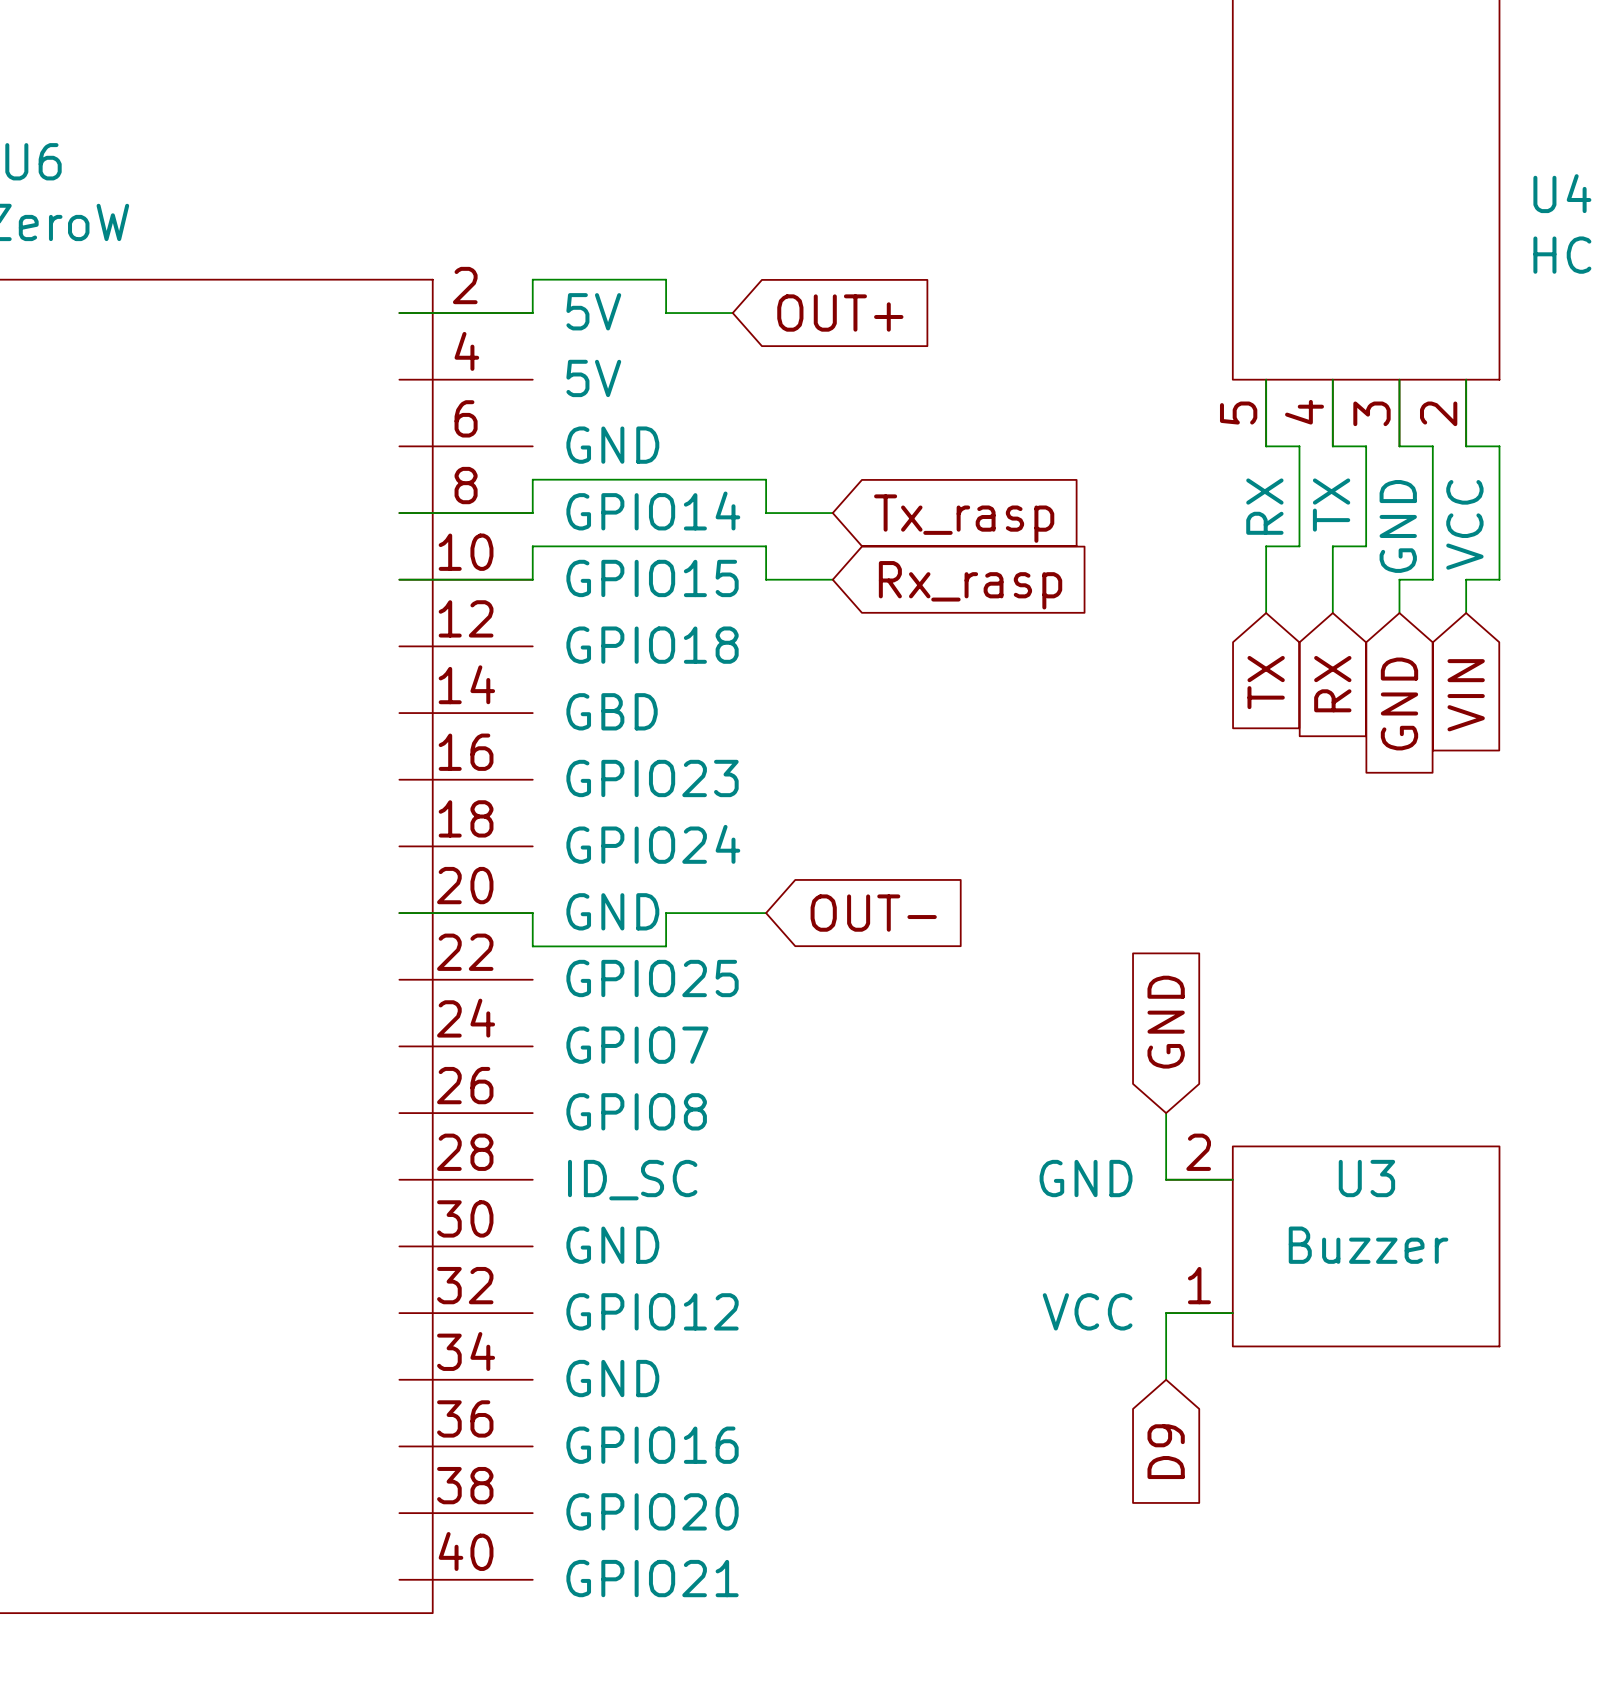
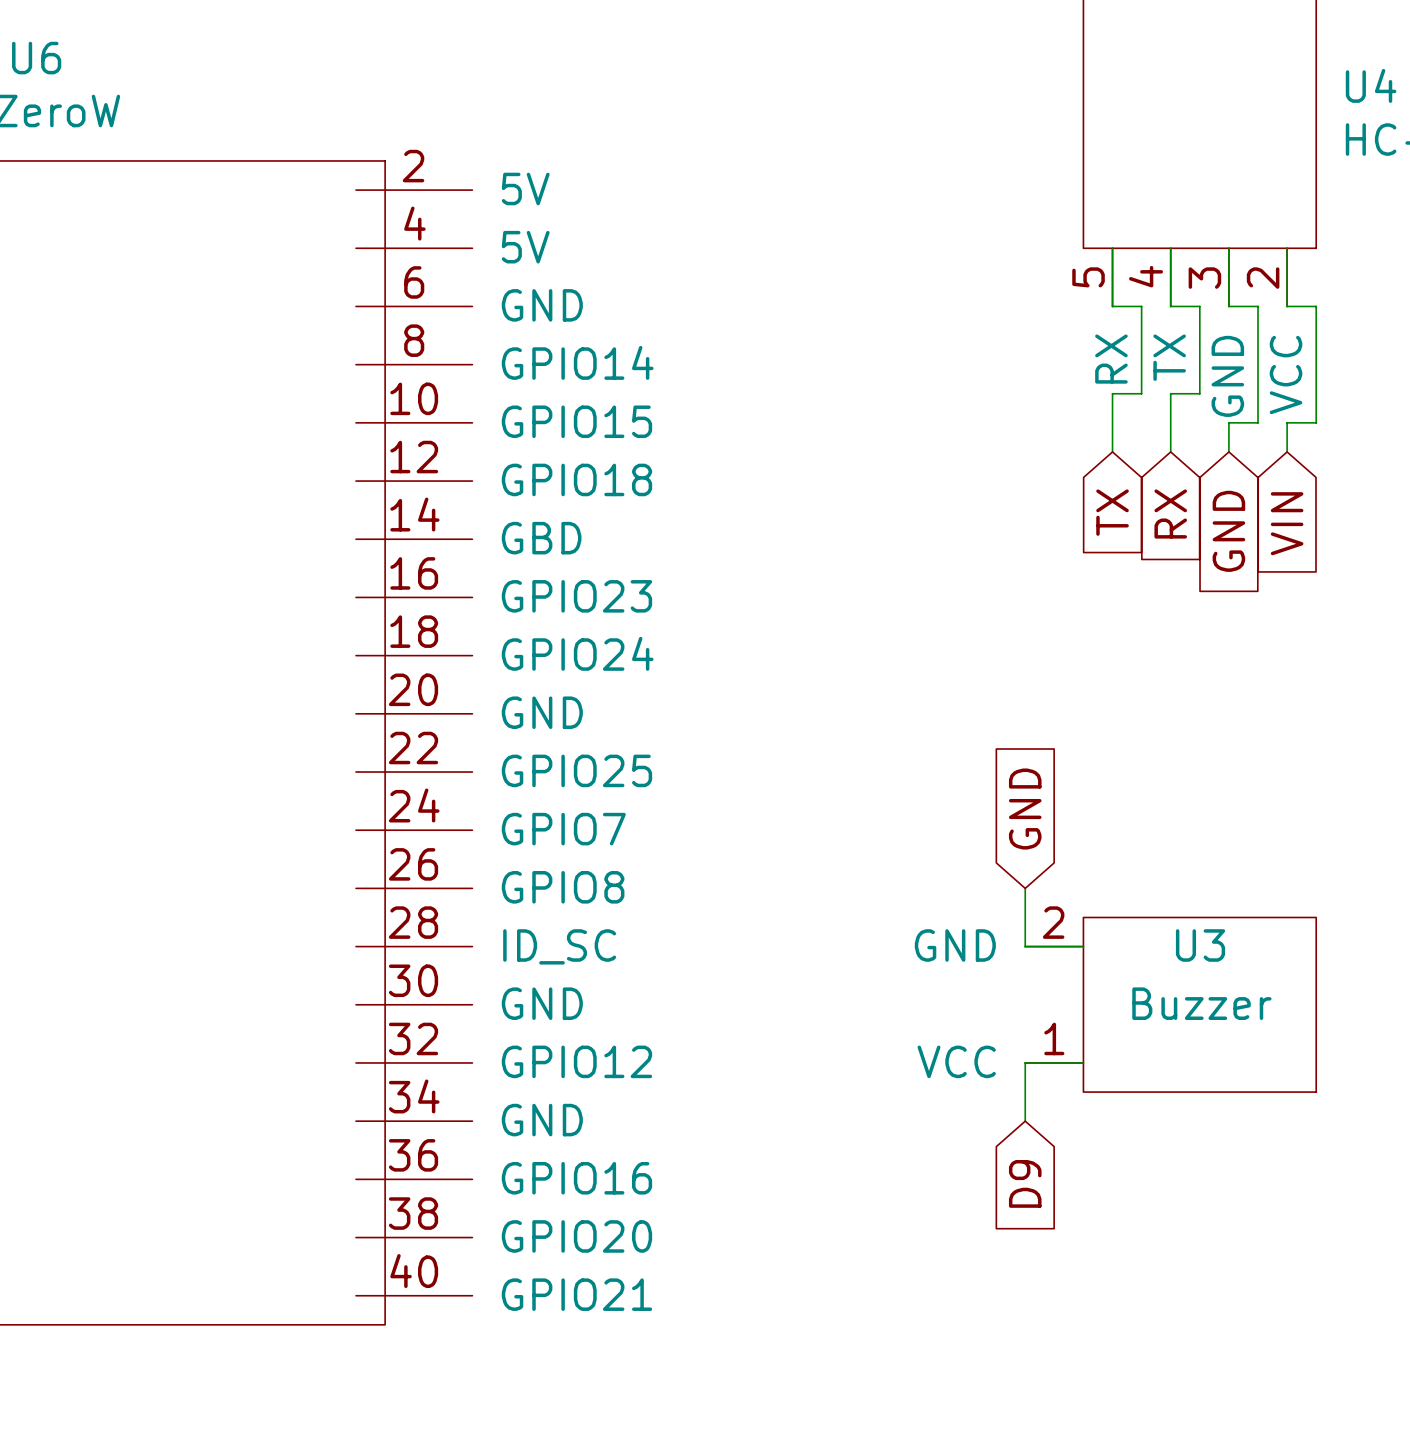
wire: (399, 313) (532, 313) (532, 279) (666, 279) (666, 313) (732, 313) -> none
global label: OUT+ (840, 313) -> none
wire: (399, 513) (532, 513) (532, 479) (766, 479) (766, 513) (832, 513) -> none
global label: Tx_rasp (964, 518) -> none
wire: (399, 579) (532, 579) (532, 546) (766, 546) (766, 579) (832, 579) -> none
global label: Rx_rasp (970, 585) -> none
wire: (399, 913) (532, 913) (532, 946) (666, 946) (666, 913) (766, 913) -> none
global label: OUT- (873, 913) -> none

